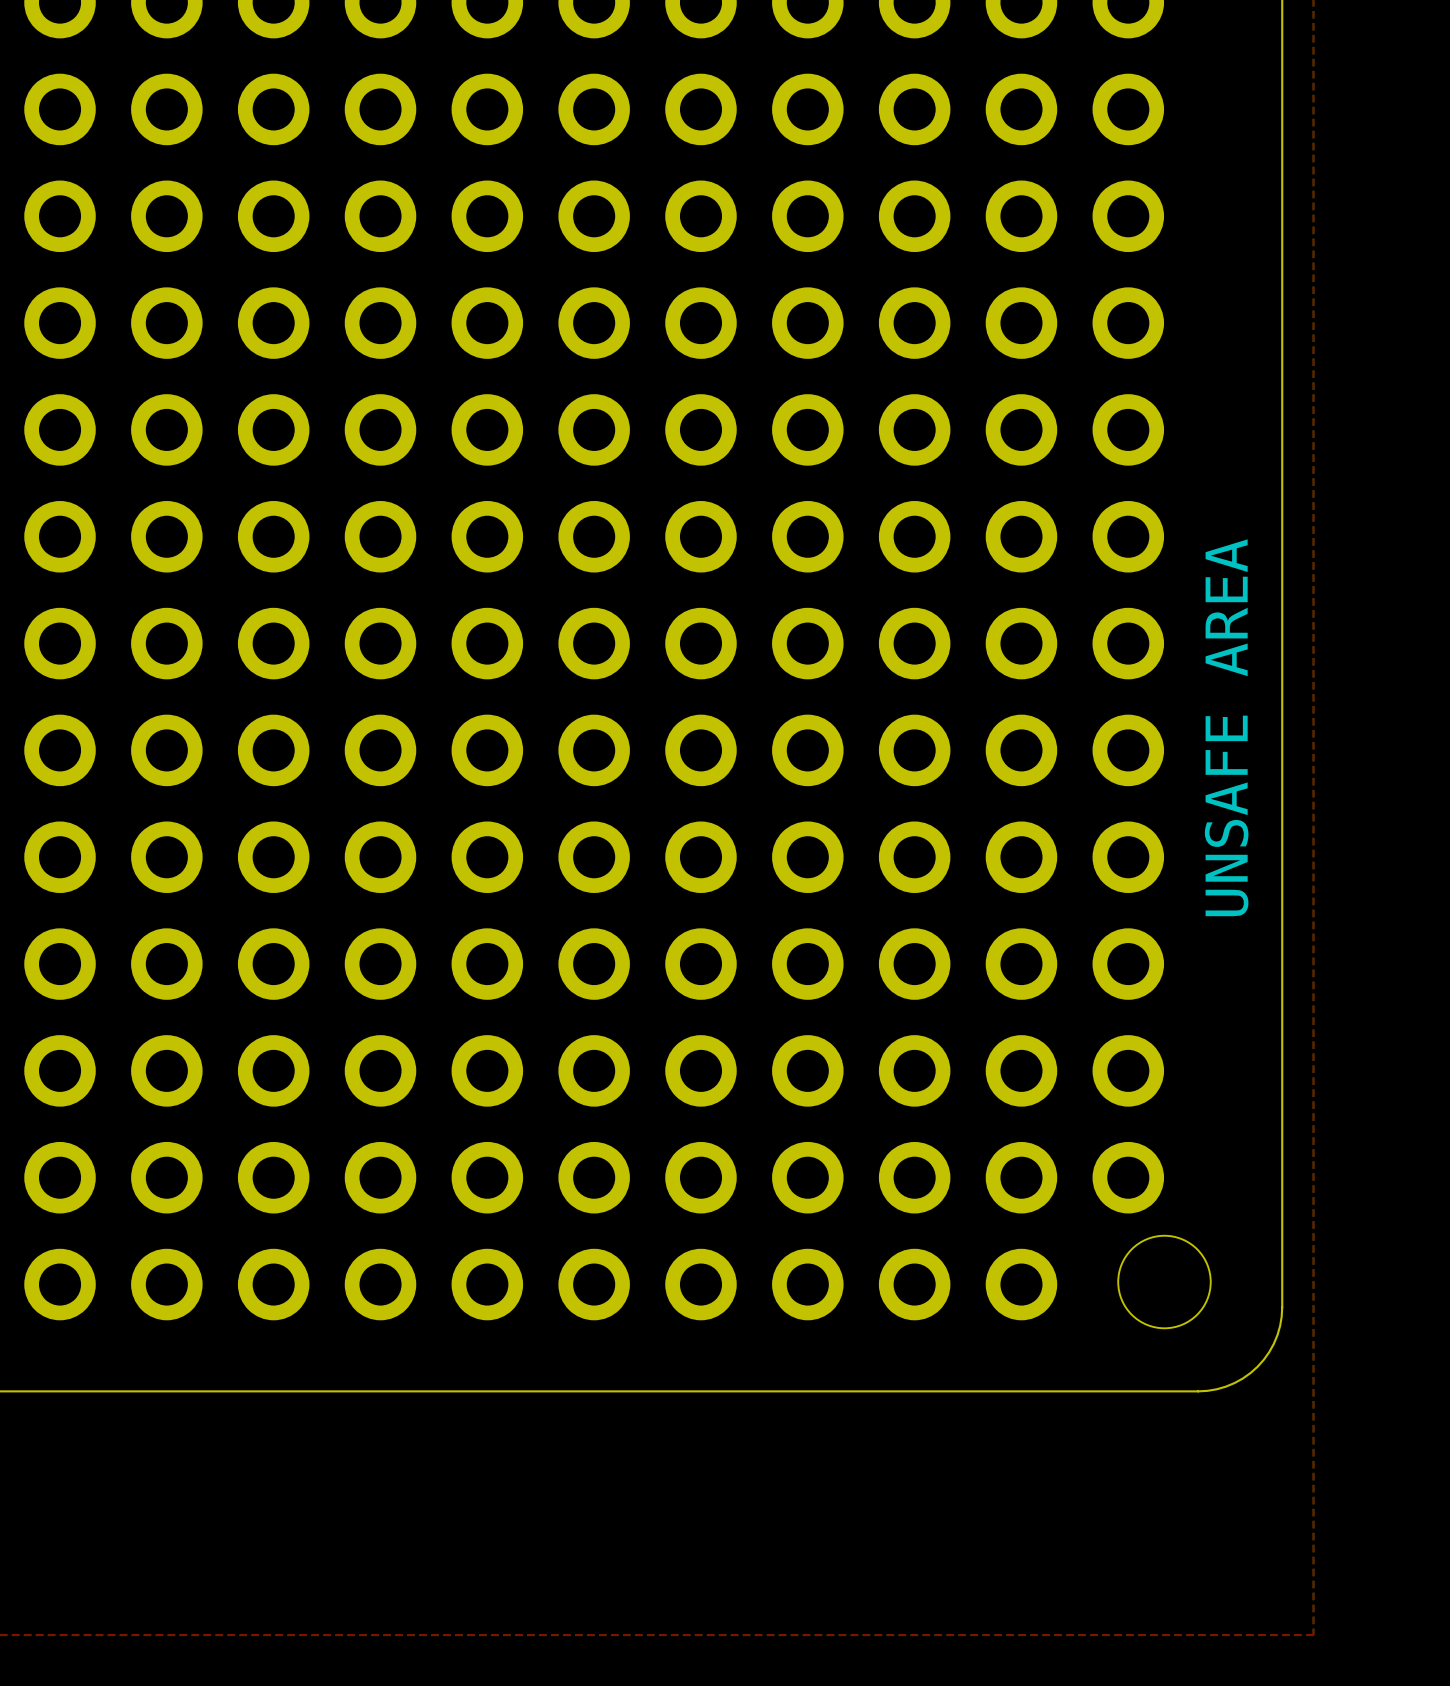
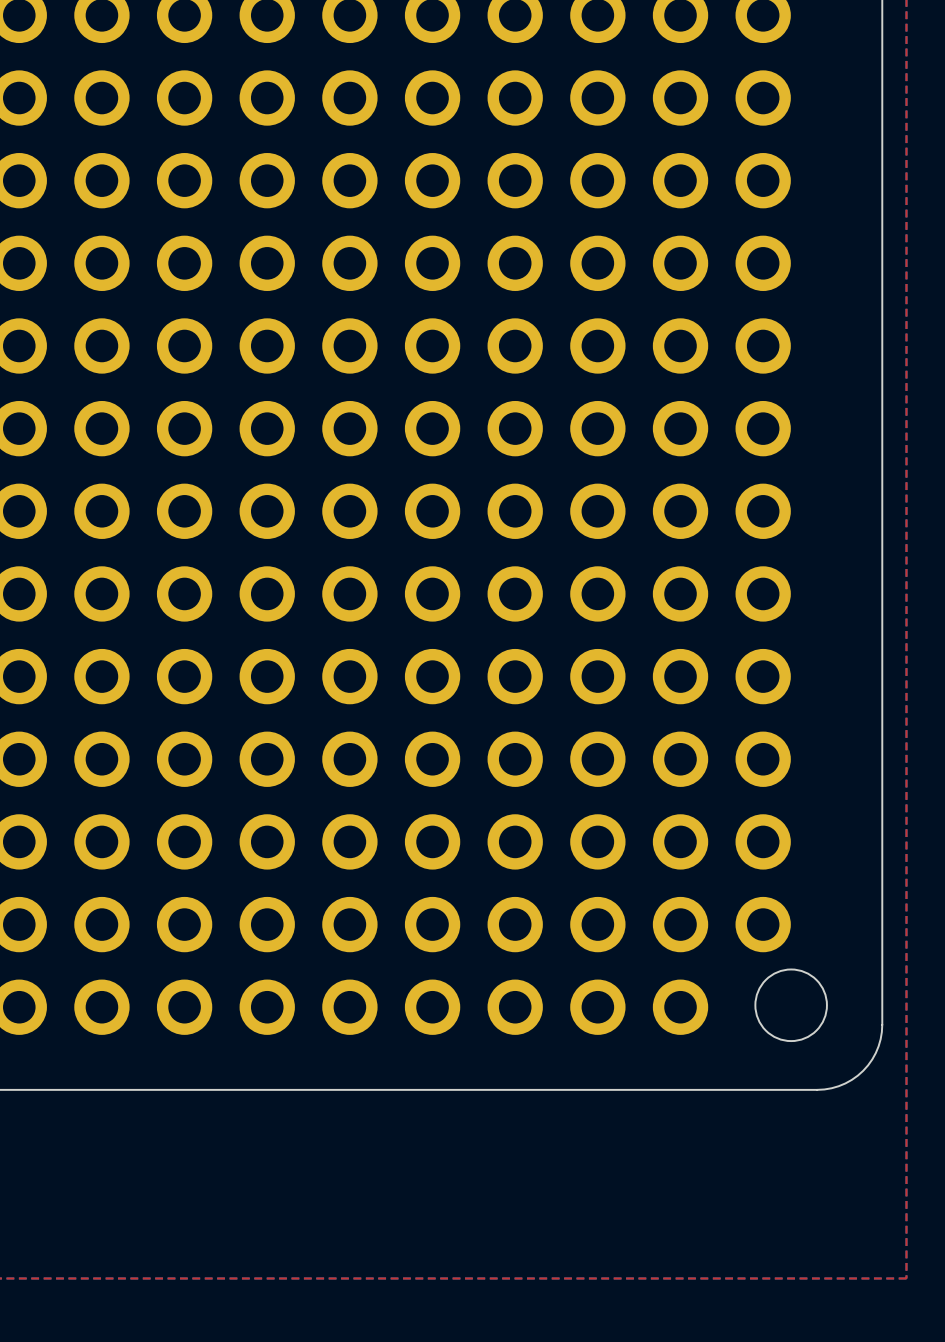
text: UNSAFE AREA (1226, 727) -> none

